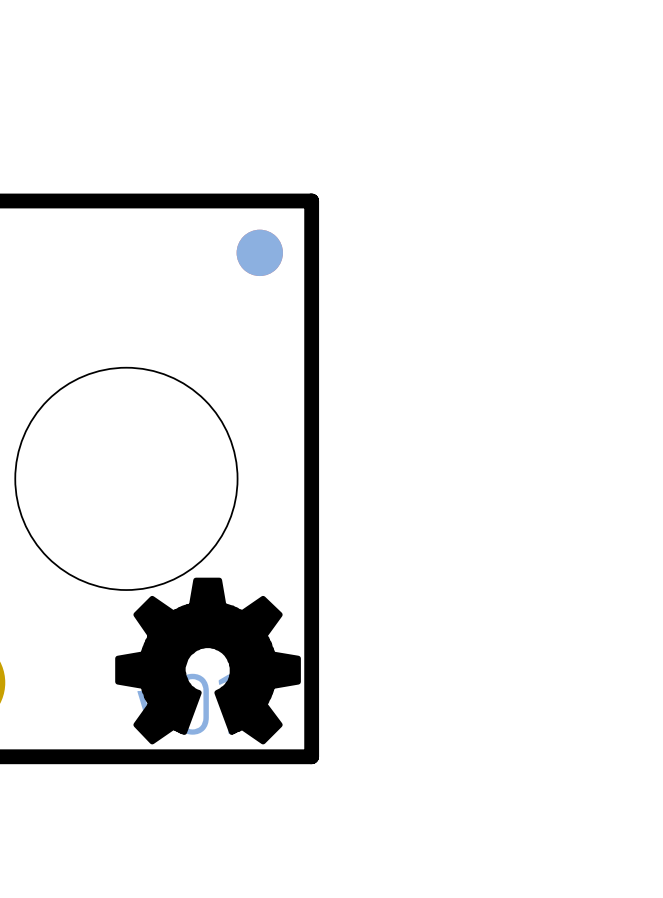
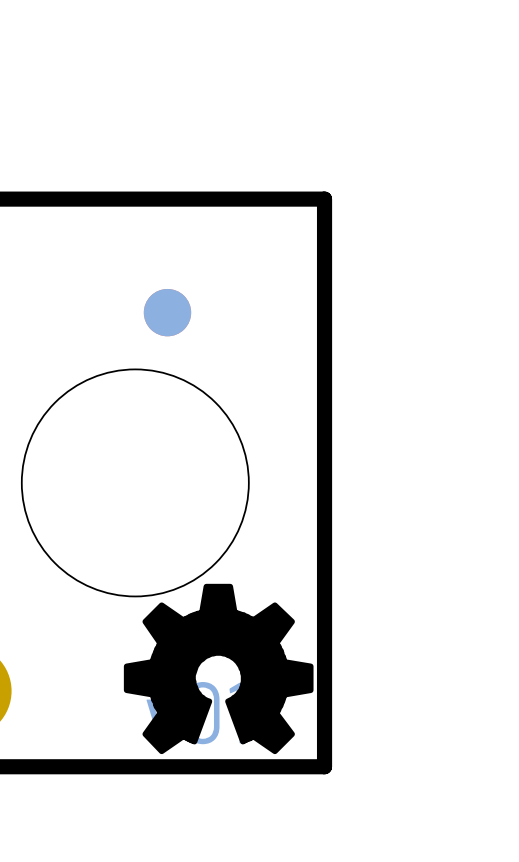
part position: (259, 252) -> (167, 312)

